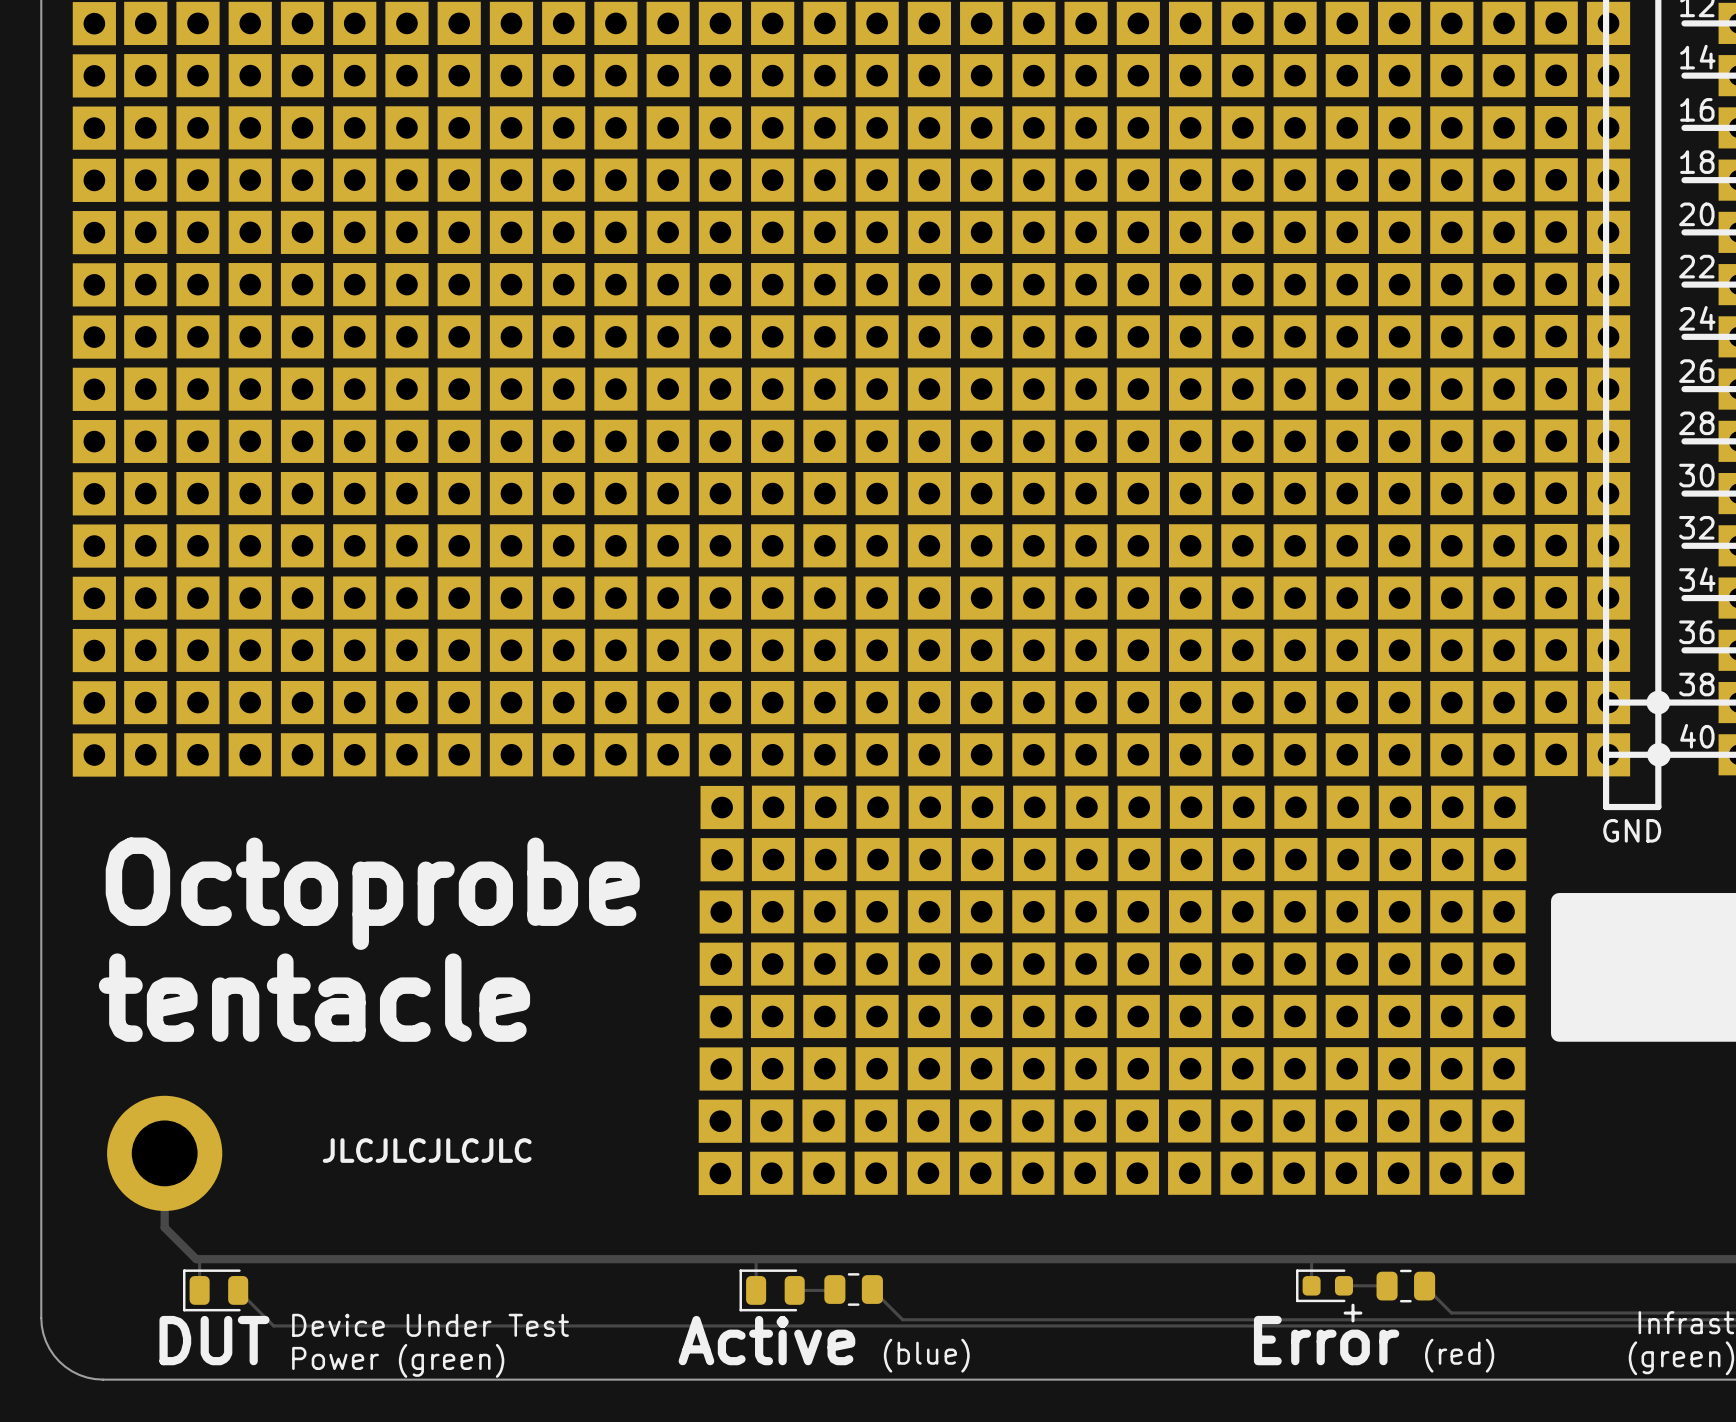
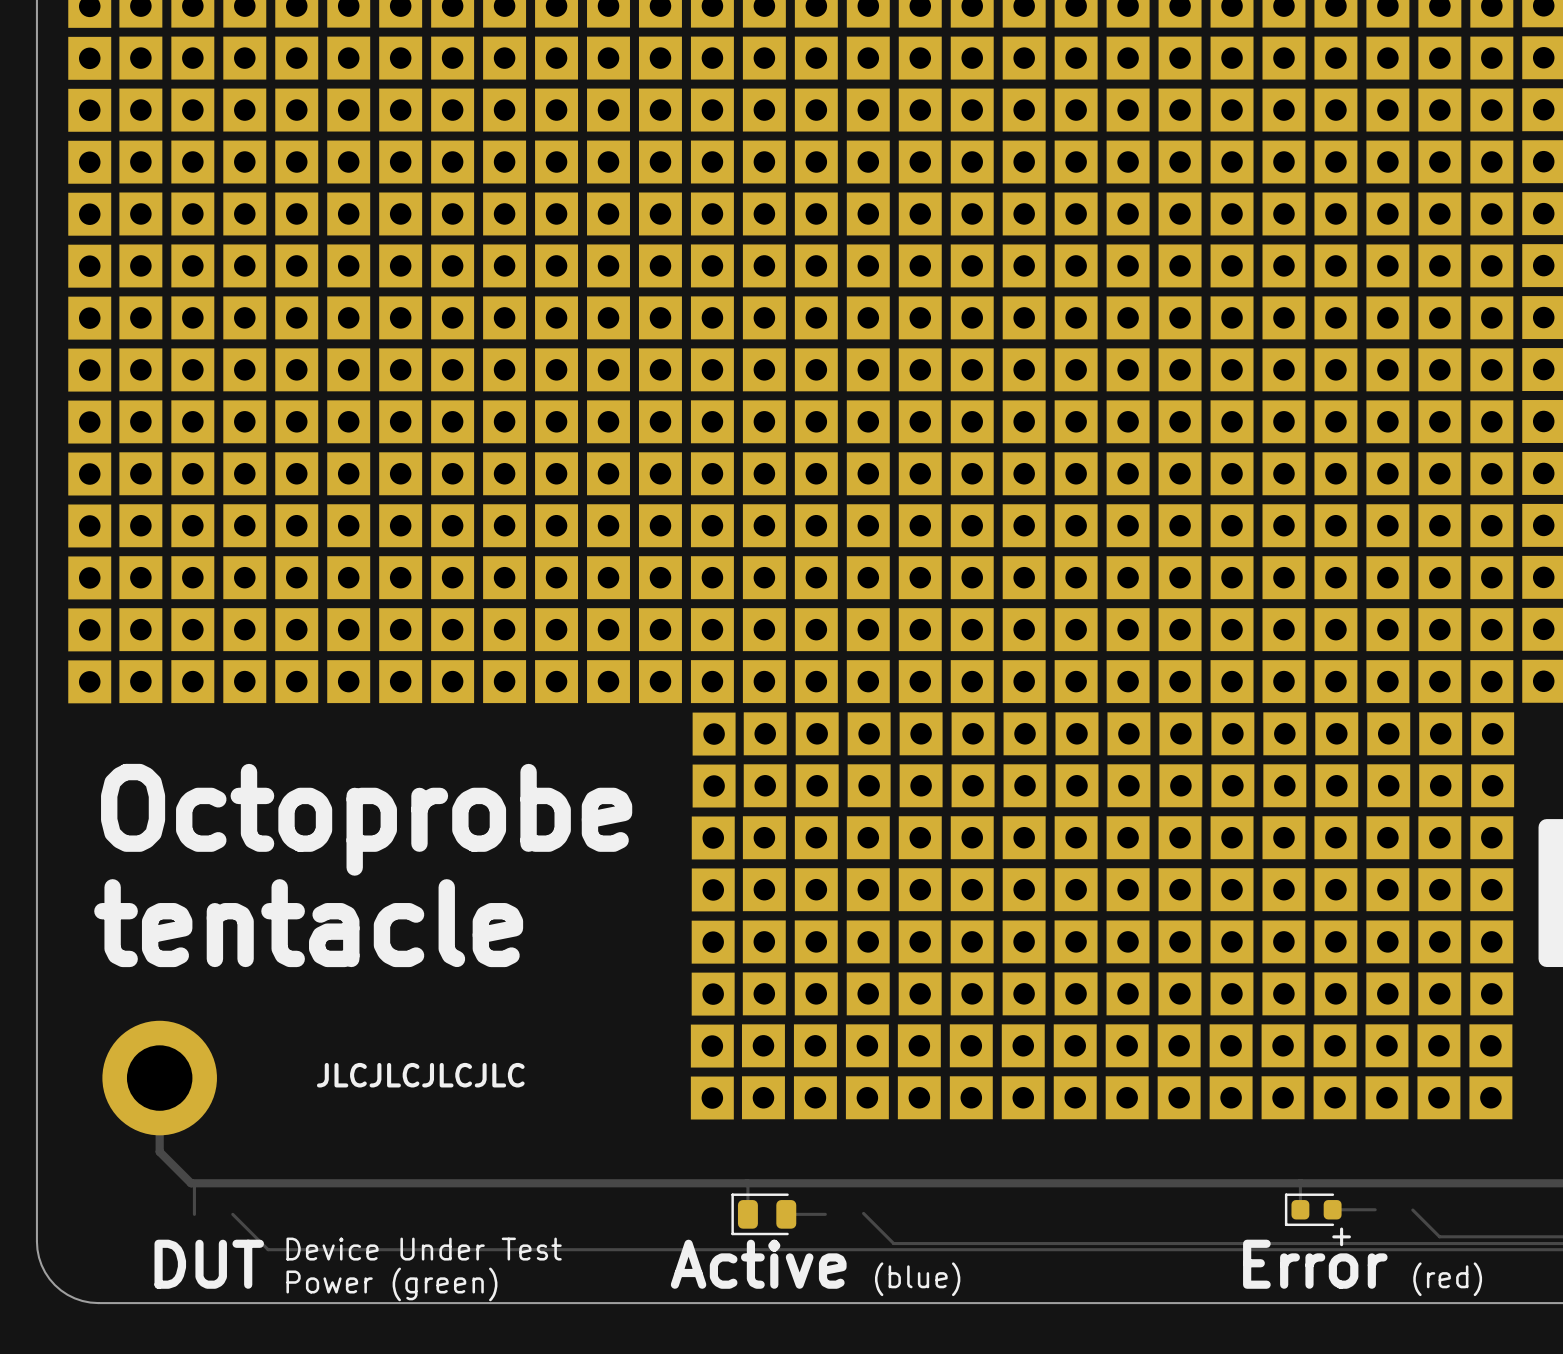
part: (1405, 1286) -> none
part: (853, 1289) -> none
part: (215, 1290) -> none

